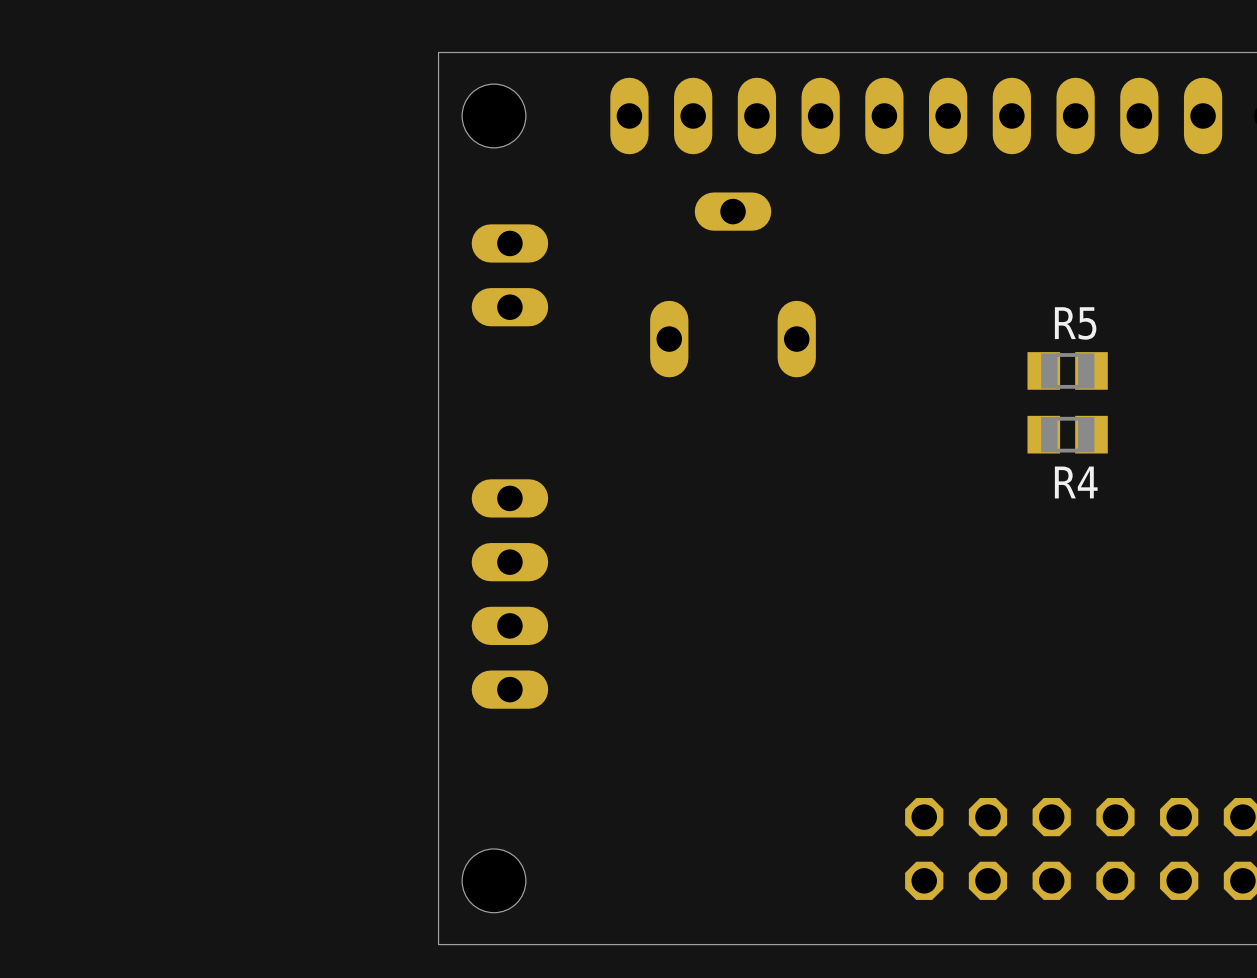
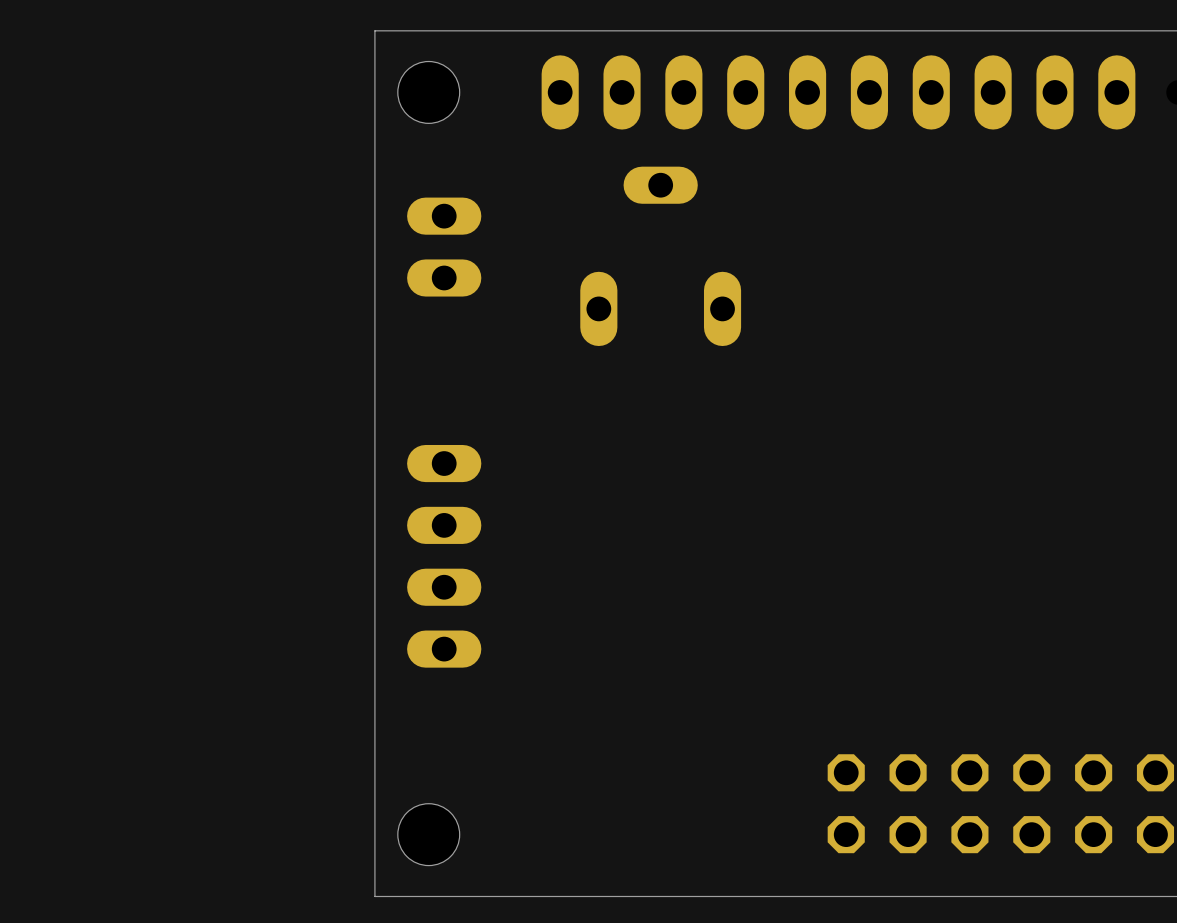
R5: (1067, 370) -> none
R4: (1067, 434) -> none

